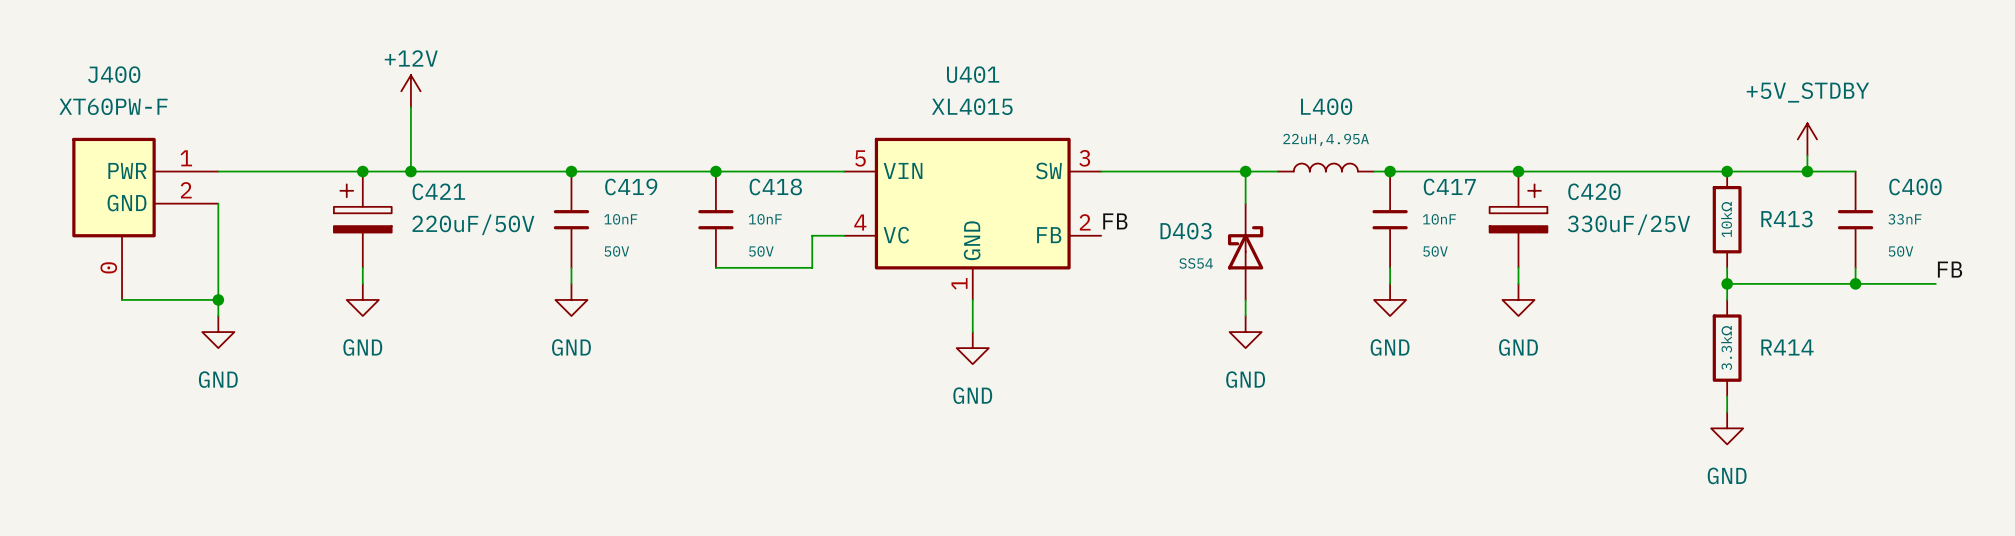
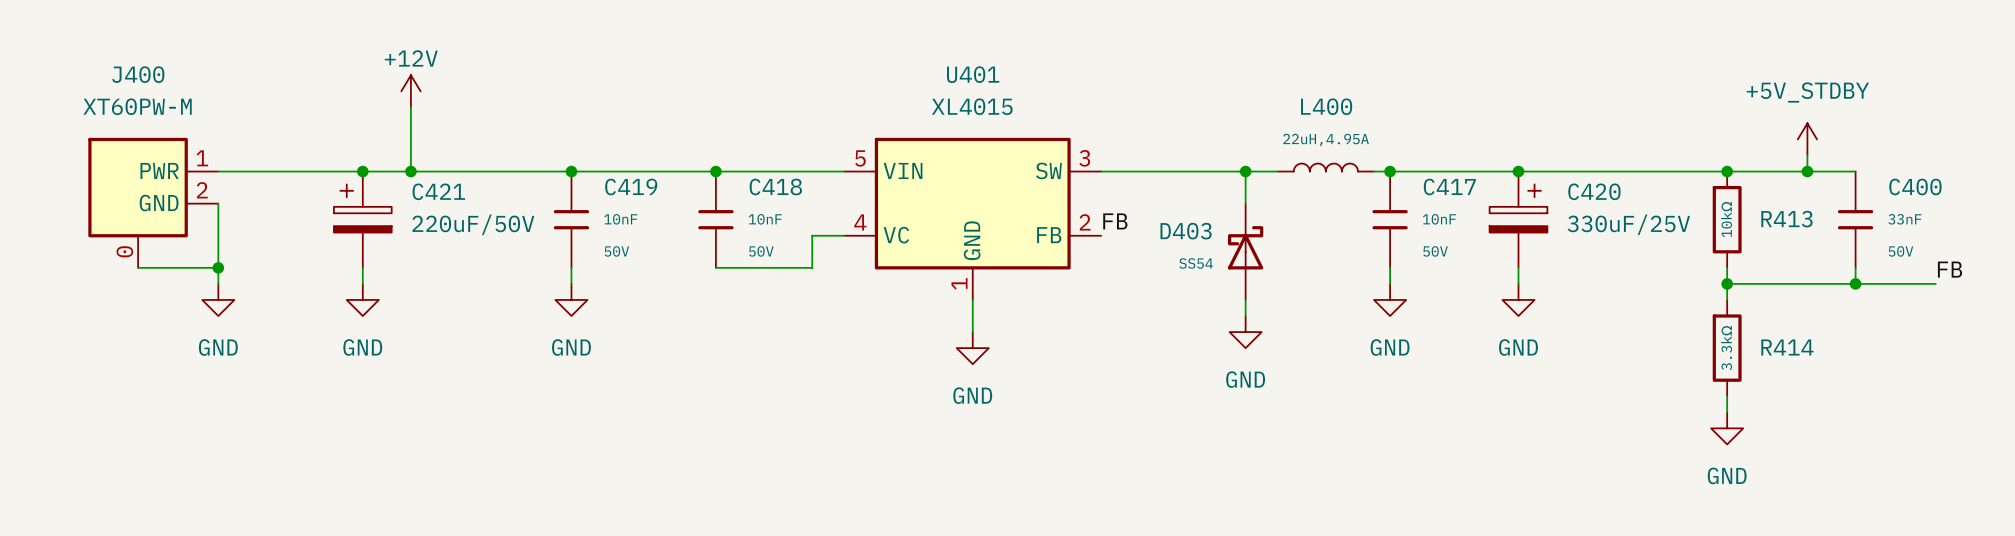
J400 value: XT60PW-F (113, 106) -> XT60PW-M (137, 106)
J400 symbol: [72, 137, 219, 300] -> [88, 137, 219, 268]
wire: none -> (138, 267) (218, 267)
wire: (122, 299) (218, 299) -> none
junction position: (218, 299) -> (218, 267)
power symbol position: GND (218, 332) -> GND (218, 299)

